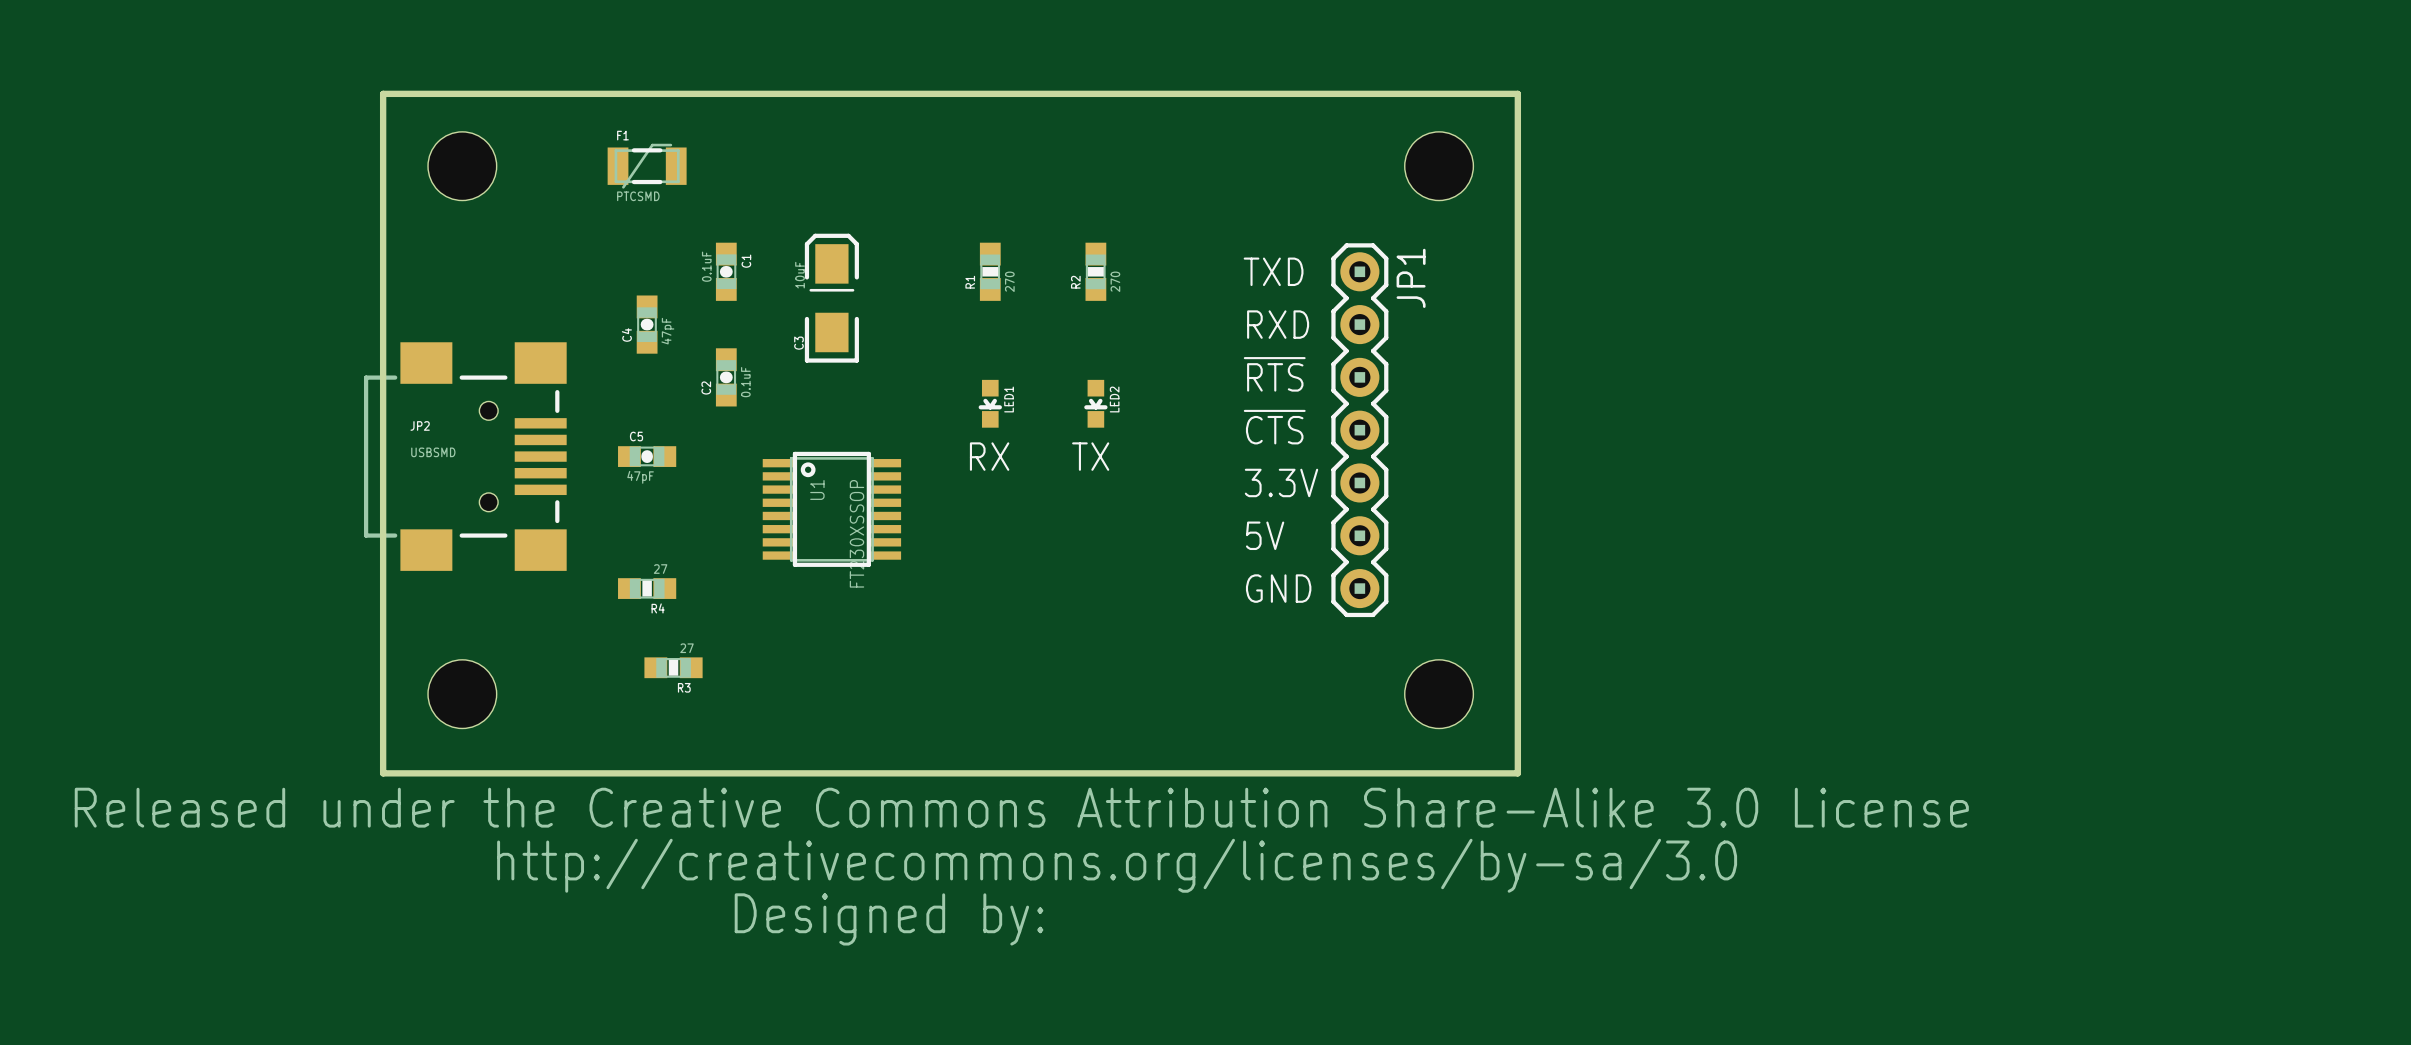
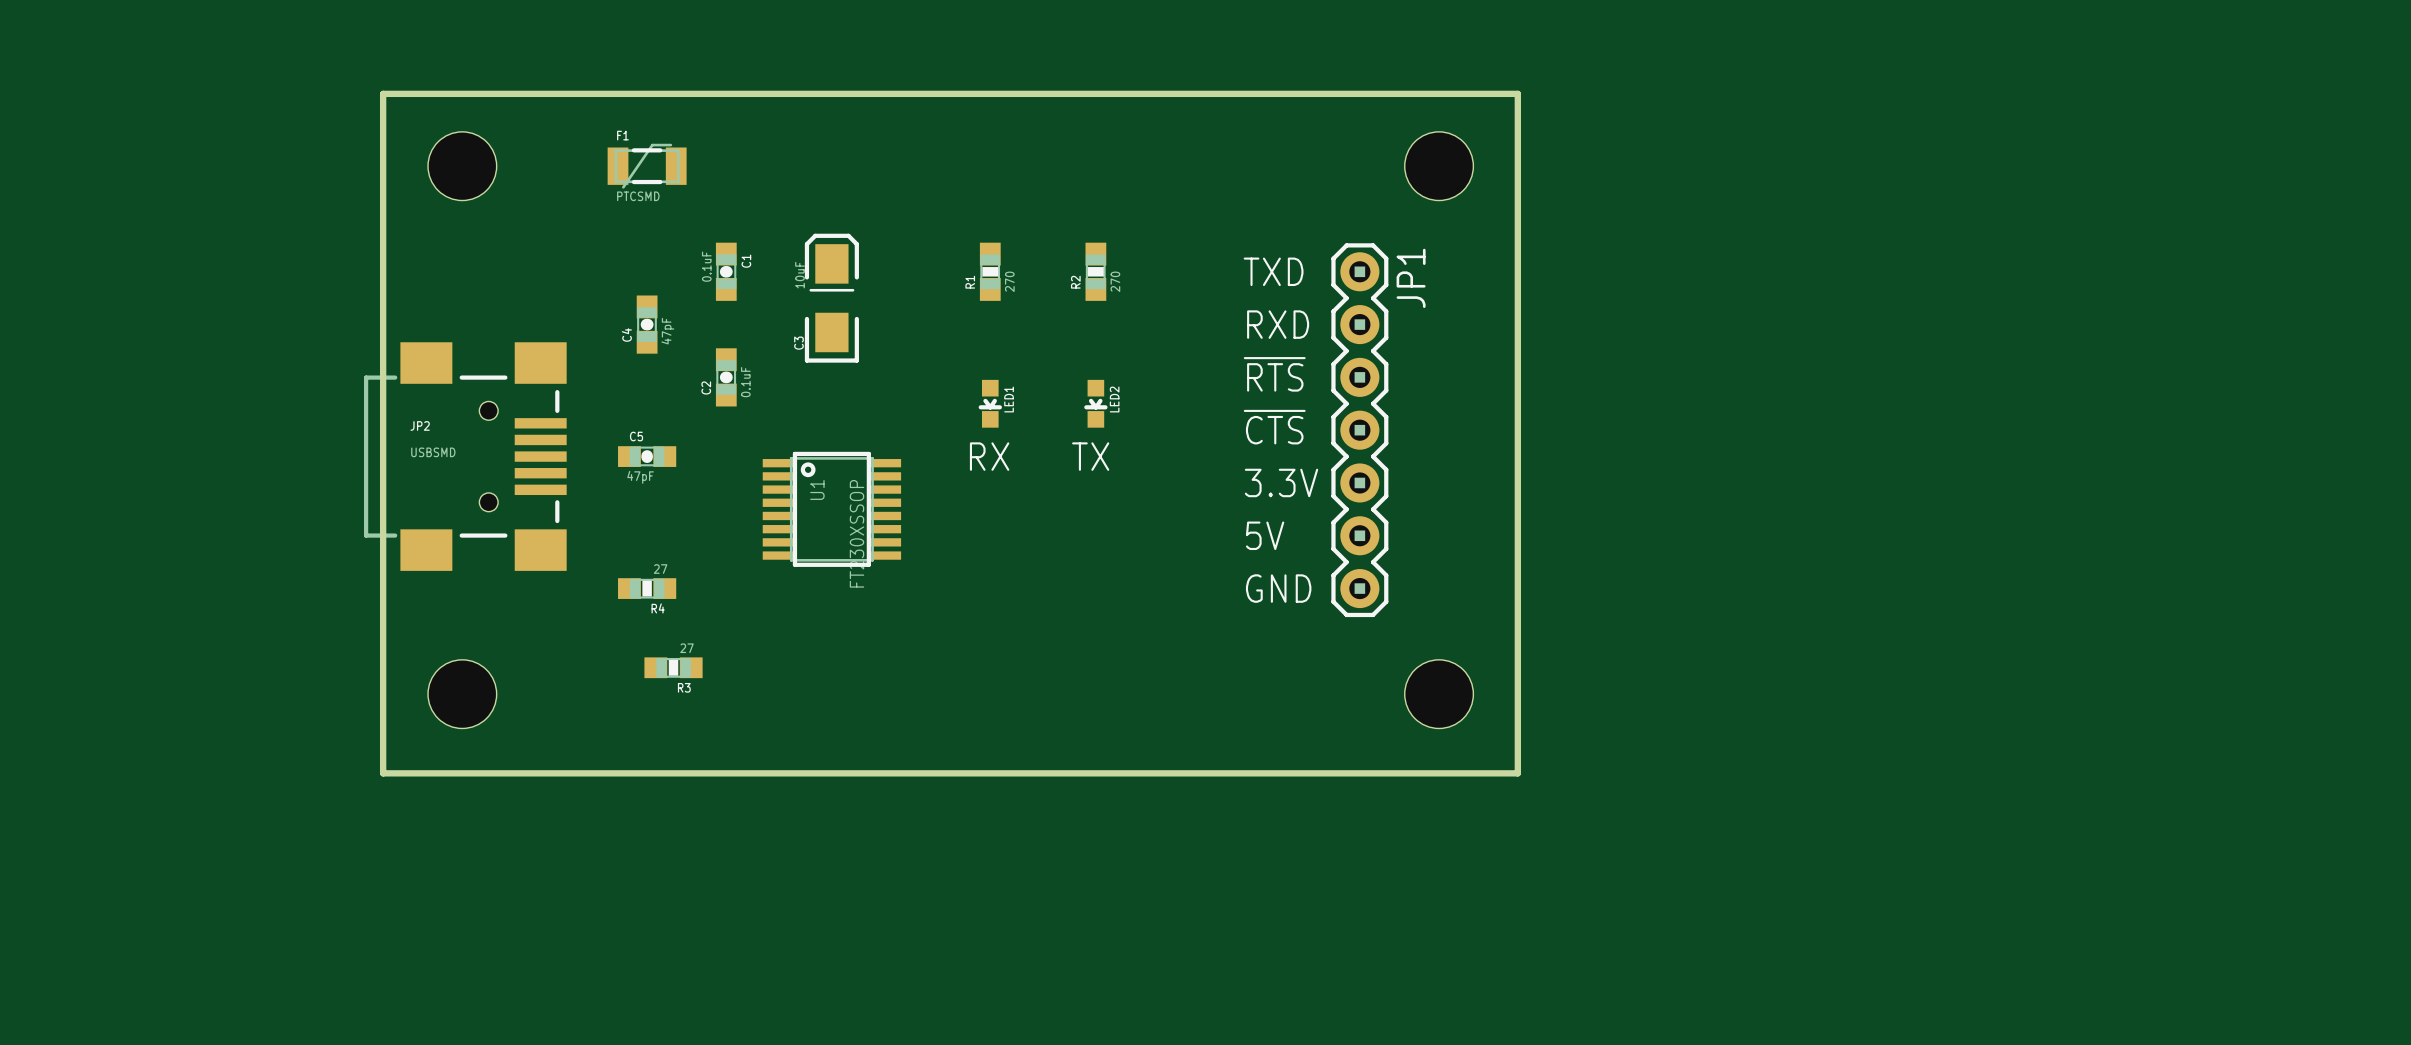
drawing: [74, 787, 1969, 946] -> none

